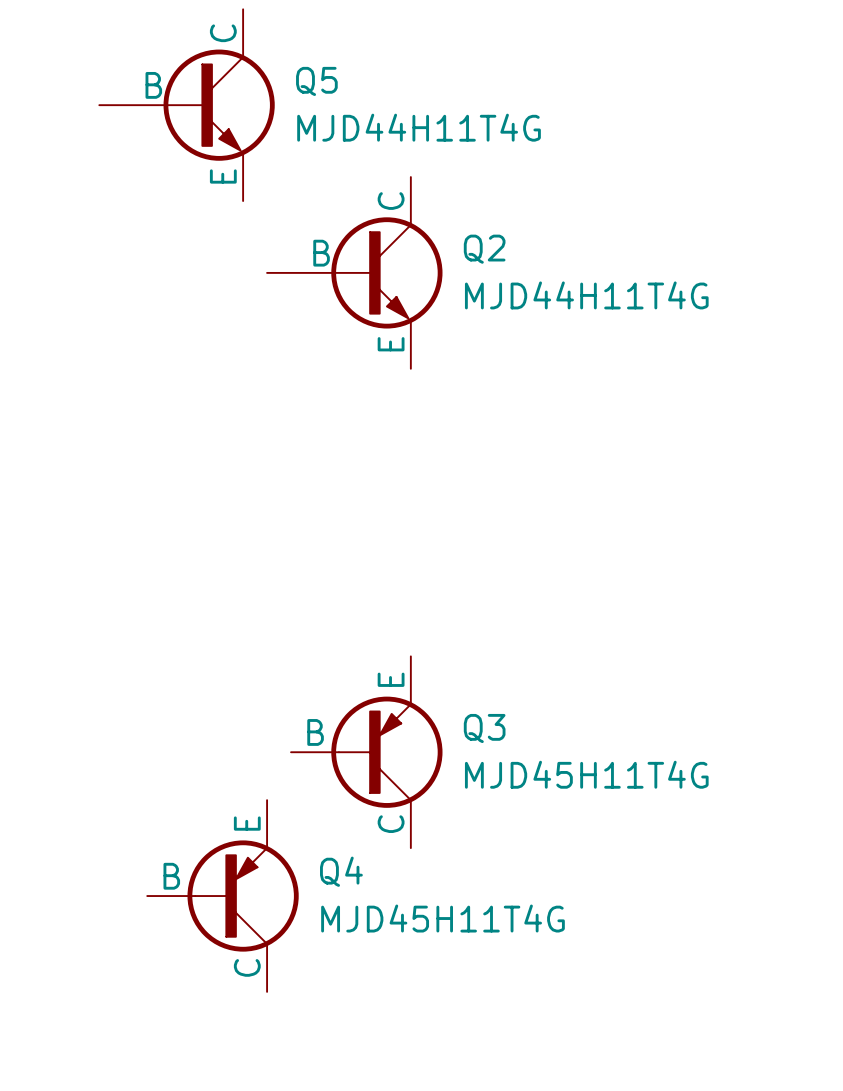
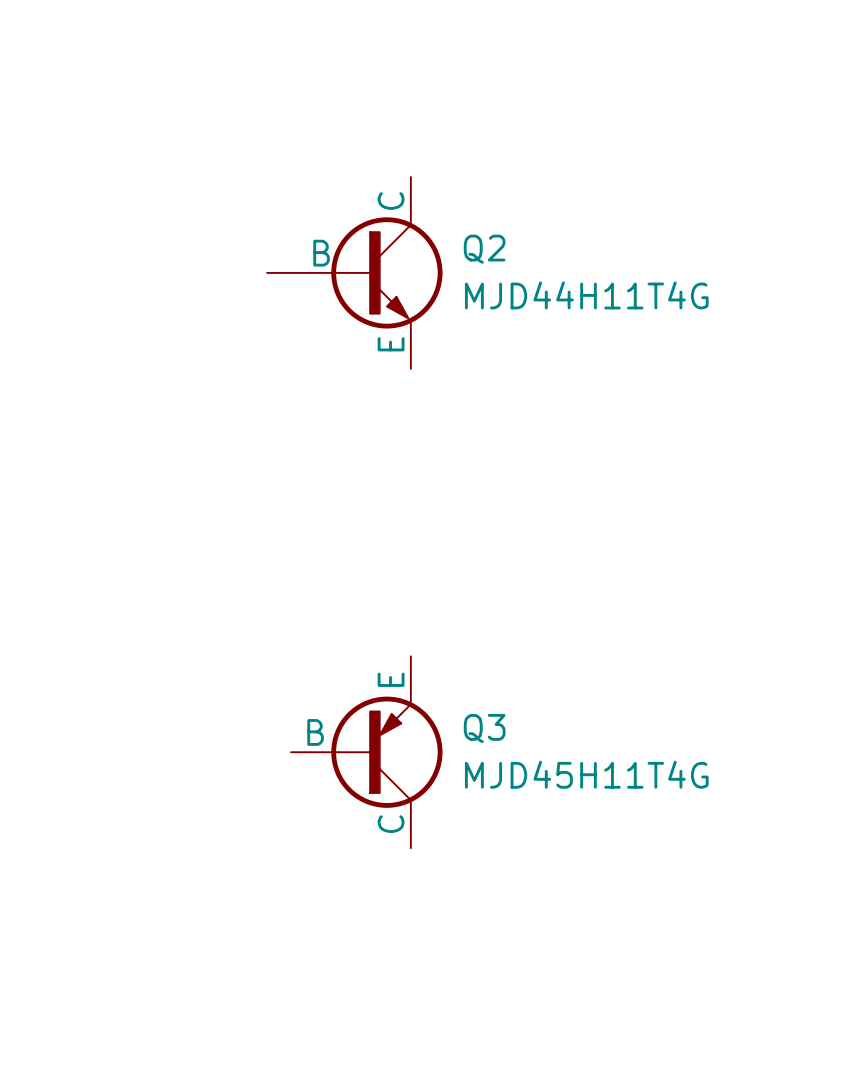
Q5: MJD44H11T4G (187, 105) -> none
Q4: MJD45H11T4G (222, 896) -> none

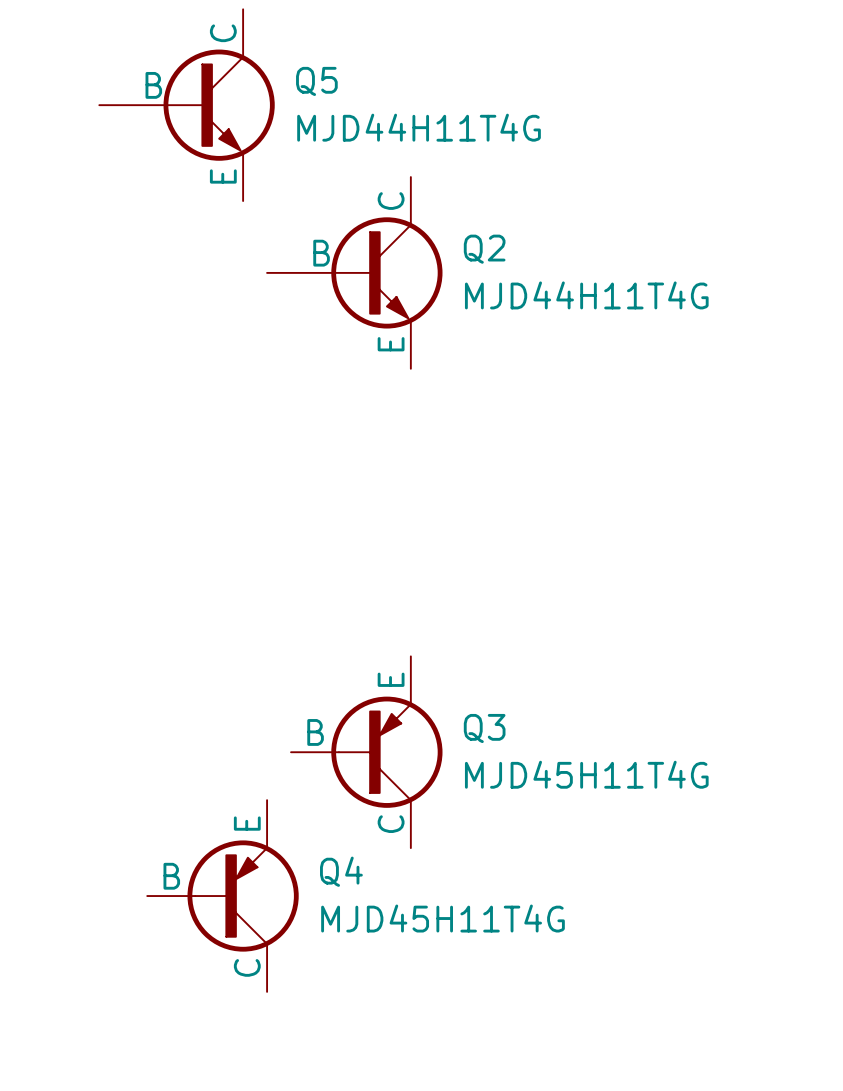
Q5: none -> MJD44H11T4G (187, 105)
Q4: none -> MJD45H11T4G (222, 896)

